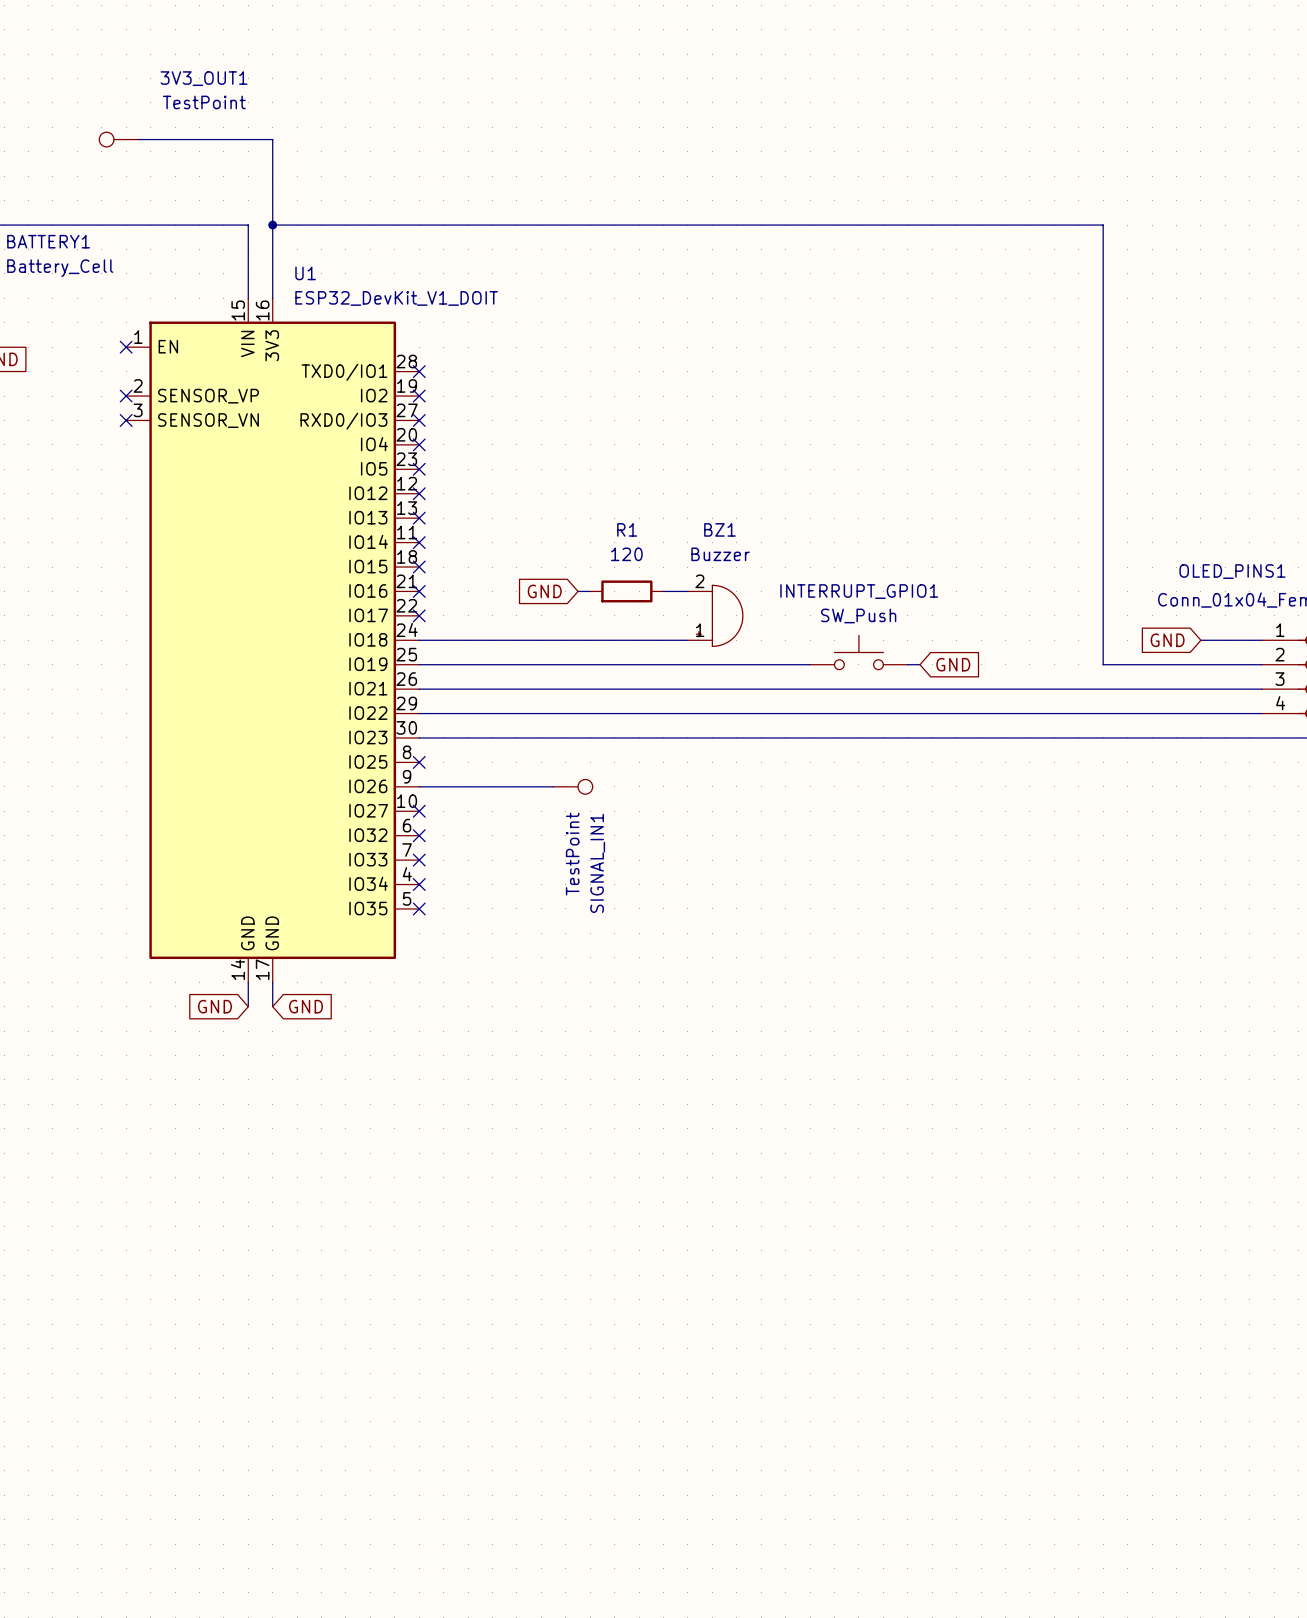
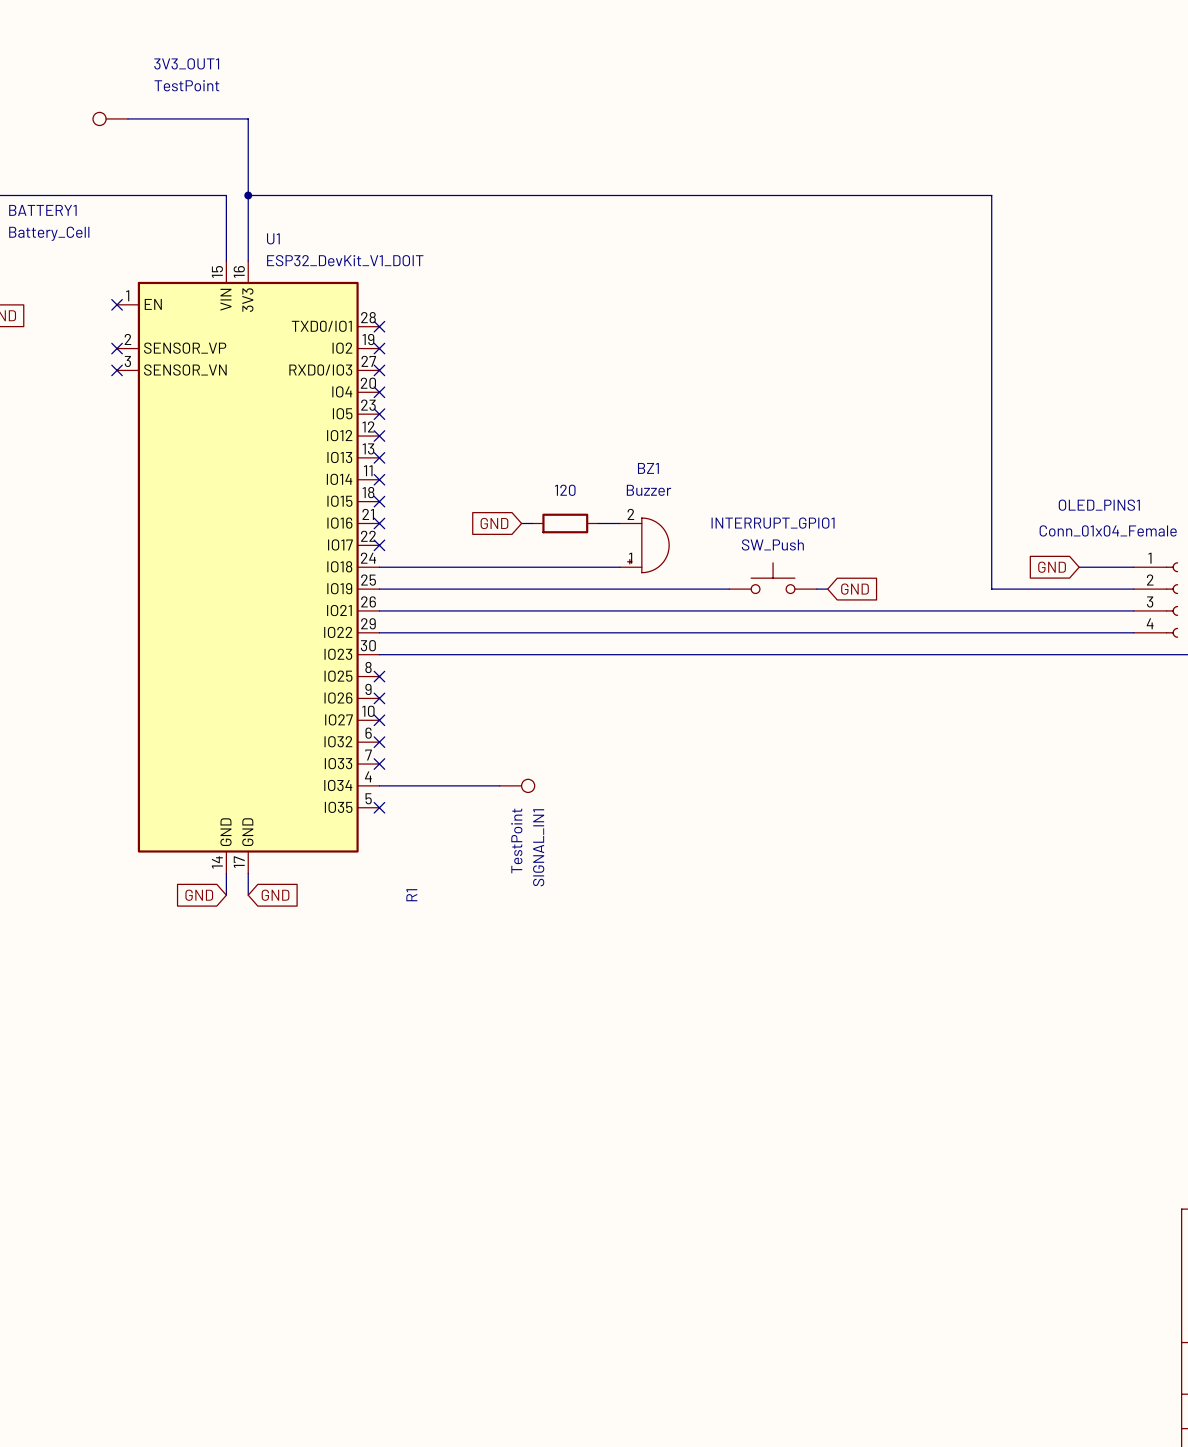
R1 name rotation: 0° (627, 529) -> 90° counterclockwise (411, 895)
R1 name position: R1 (627, 529) -> R1 (411, 895)
wire: (419, 786) (553, 786) -> (379, 785) (499, 785)
no-connect mark: none -> (379, 698)
SIGNAL_IN1 position: (573, 786) -> (517, 785)
no-connect mark: (419, 884) -> none

